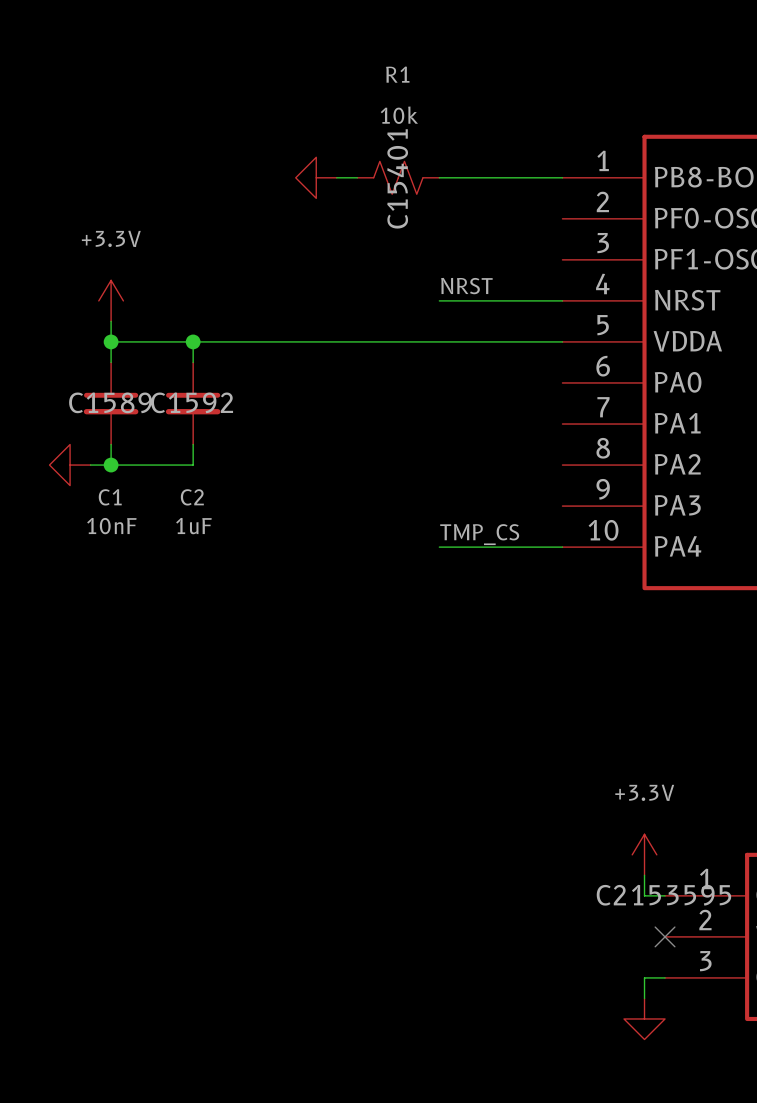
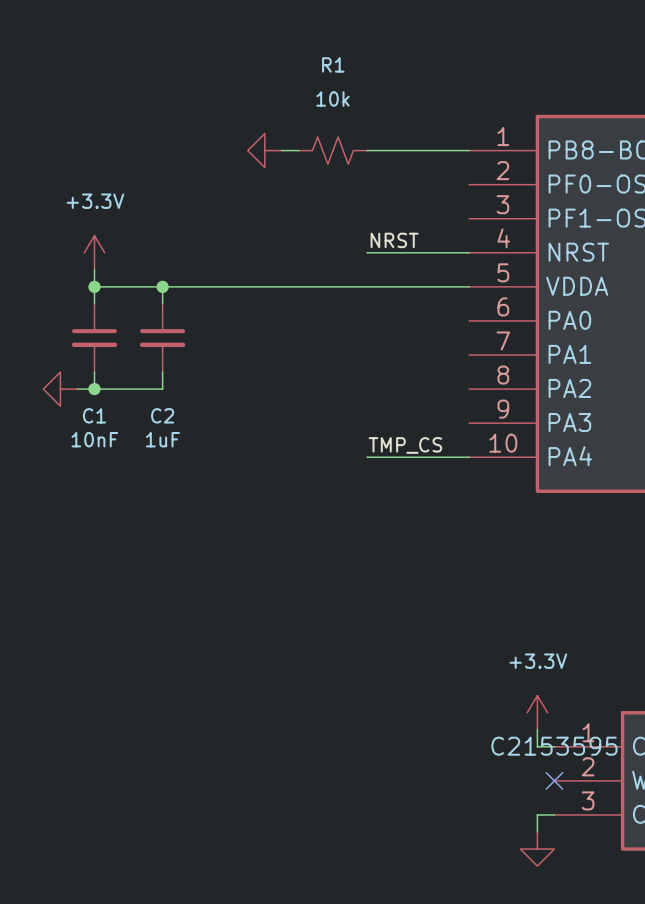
R1 text: C15401 (397, 178) -> none
C1 text: C1589 (110, 402) -> none
C2 text: C1592 (192, 402) -> none

